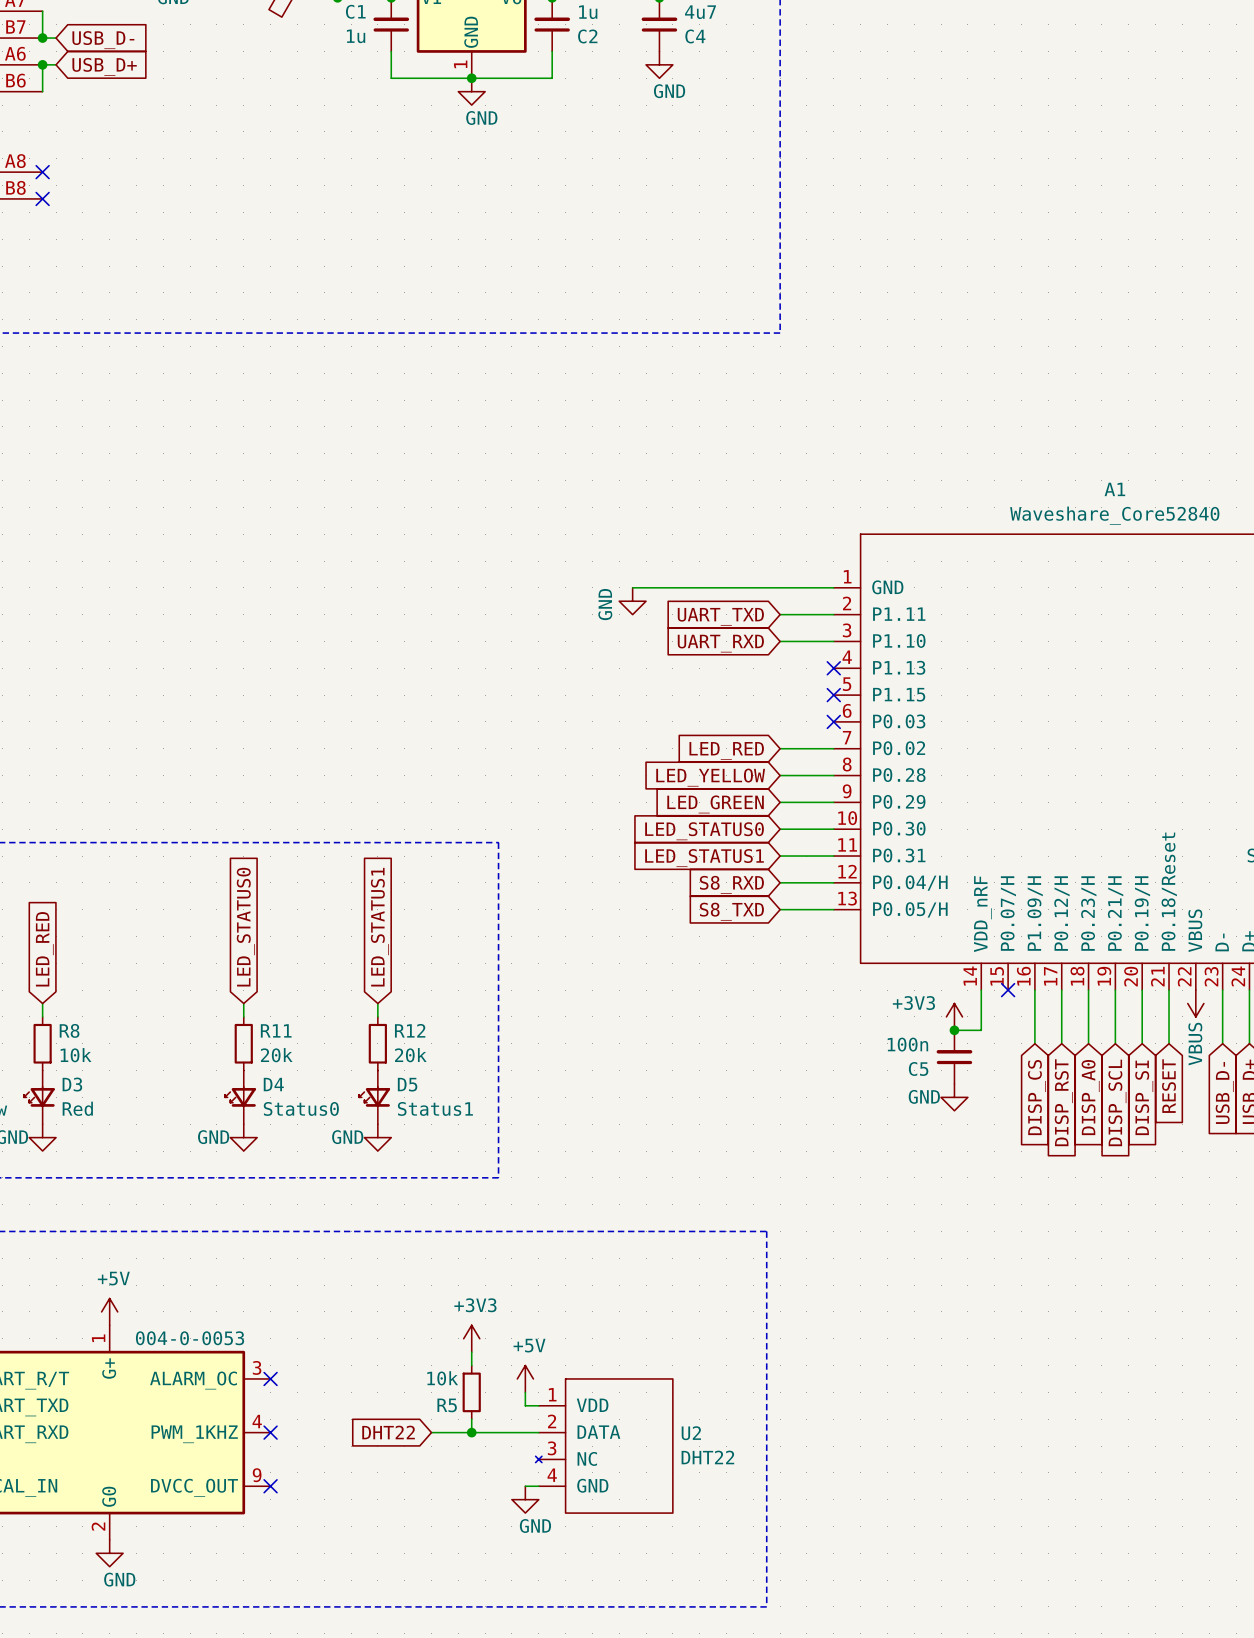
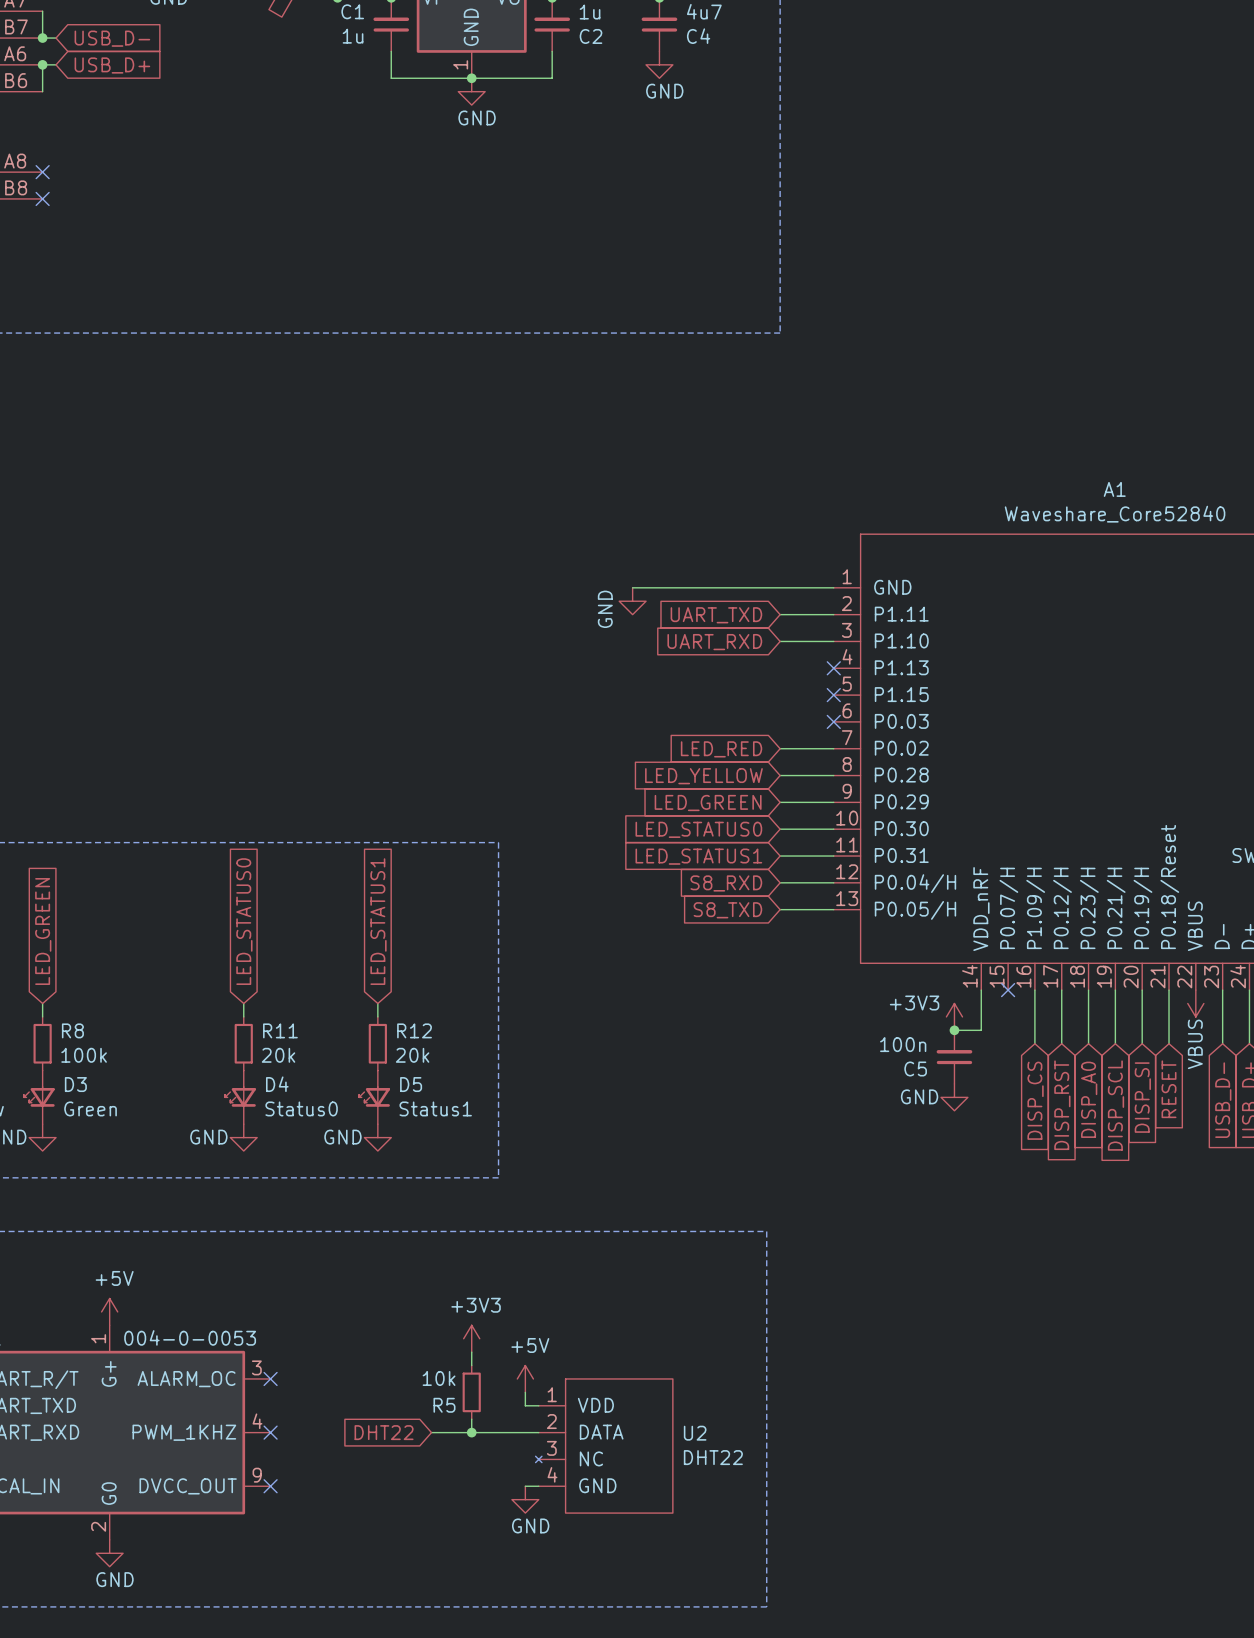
global label: LED_RED (44, 949) -> LED_GREEN (43, 931)
R8 value: 10k (76, 1055) -> 100k (84, 1055)
D3 value: Red (77, 1108) -> Green (90, 1108)

